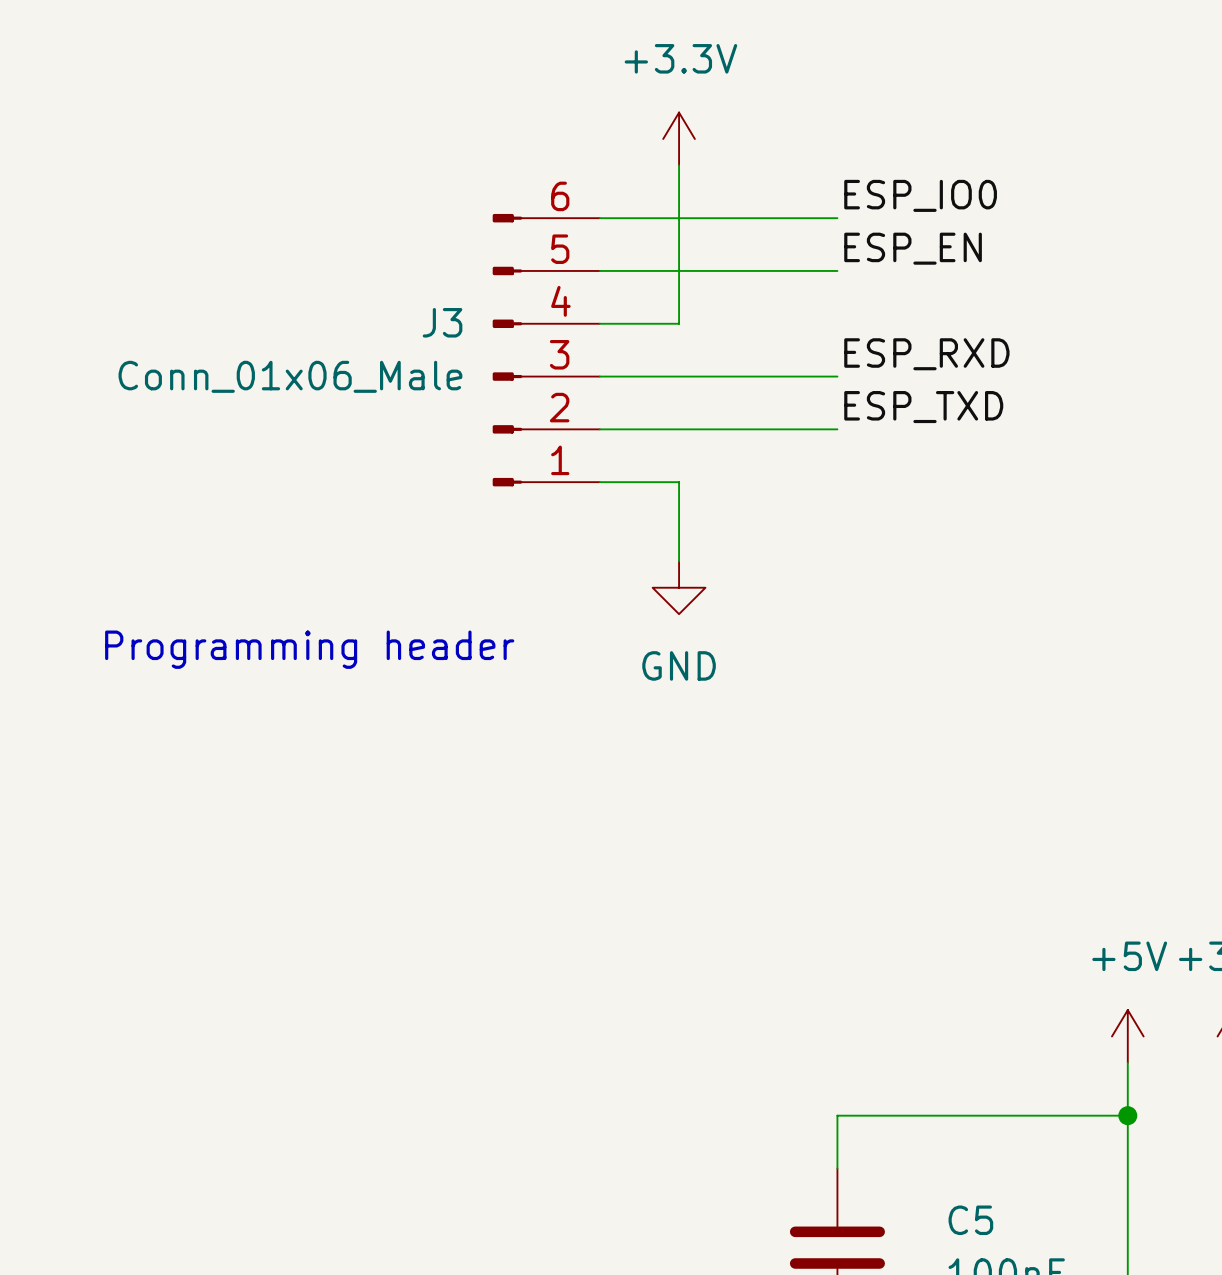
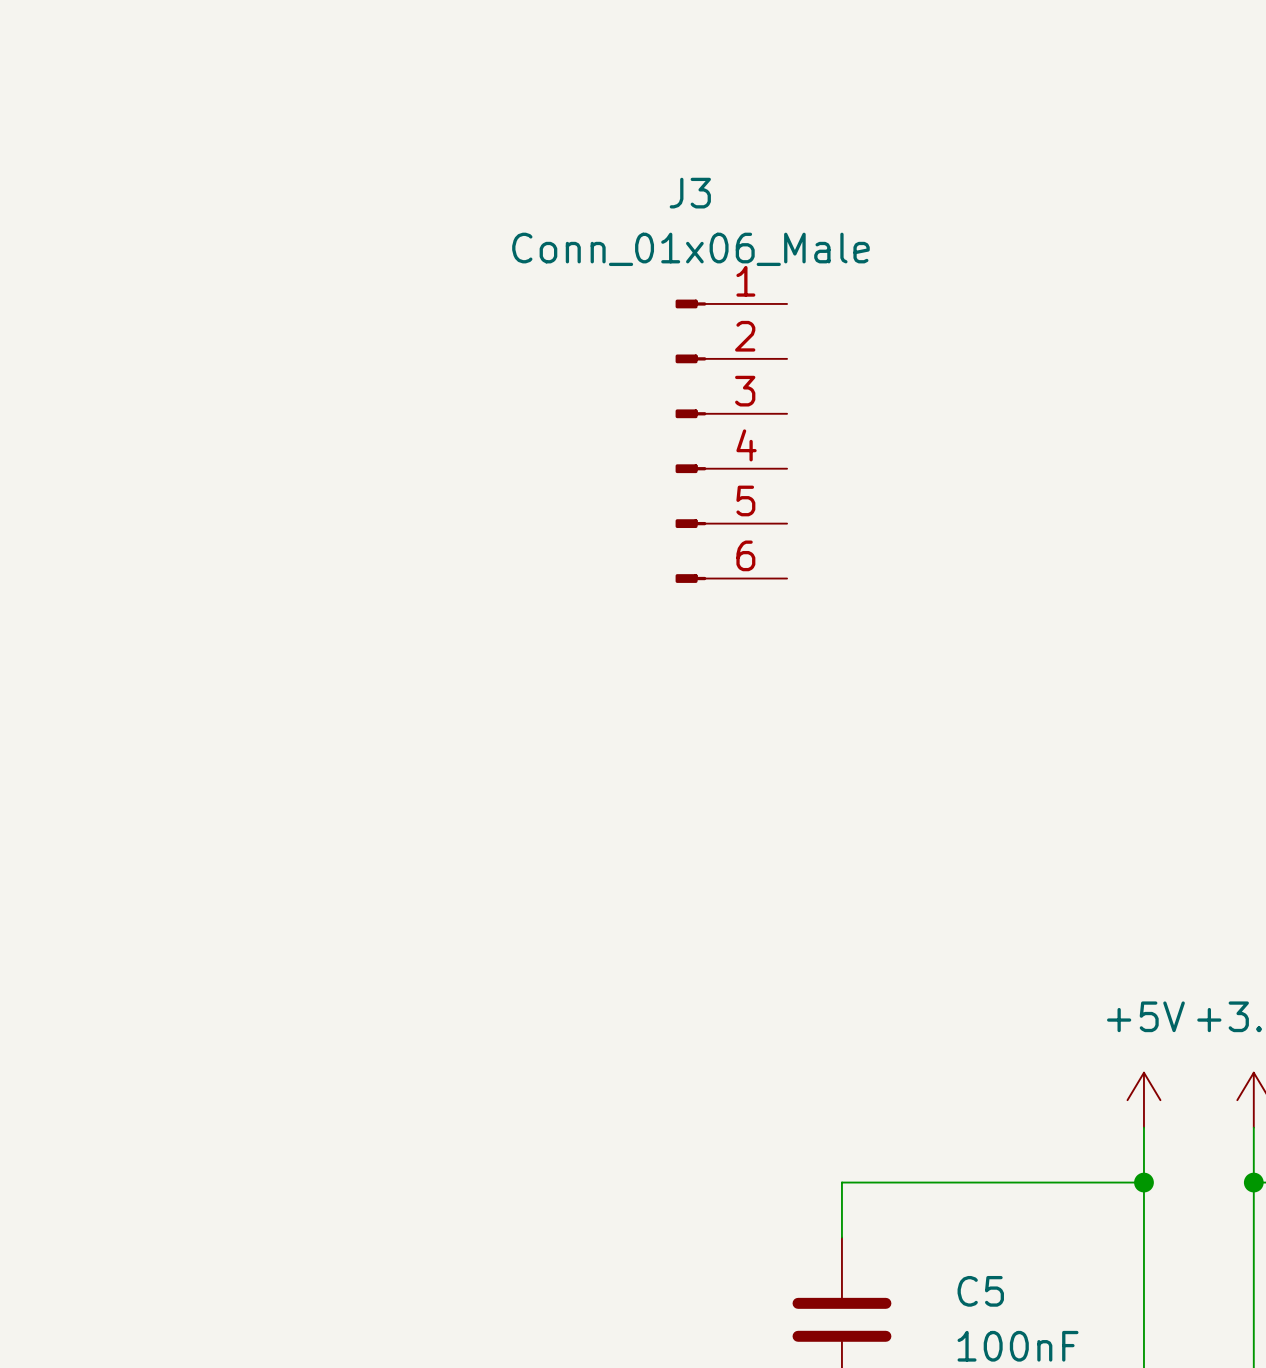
power symbol: +3.3V (679, 138) -> none
wire: (679, 165) (679, 323) (599, 323) -> none
label: ESP_IO0 (920, 195) -> none
wire: (599, 218) (837, 218) -> none
label: ESP_EN (913, 248) -> none
wire: (599, 270) (837, 270) -> none
J3 name position: J3 (442, 322) -> J3 (690, 193)
J3 flip: as is (507, 350) -> up-down (690, 441)
J3 position: (546, 350) -> (731, 441)
label: ESP_RXD (926, 354) -> none
J3 value position: Conn_01x06_Male (290, 376) -> Conn_01x06_Male (690, 249)
wire: (599, 376) (837, 376) -> none
label: ESP_TXD (923, 407) -> none
wire: (599, 429) (837, 429) -> none
wire: (599, 482) (679, 482) (679, 561) -> none
power symbol: GND (679, 587) -> none
text: Programming header (309, 649) -> none

